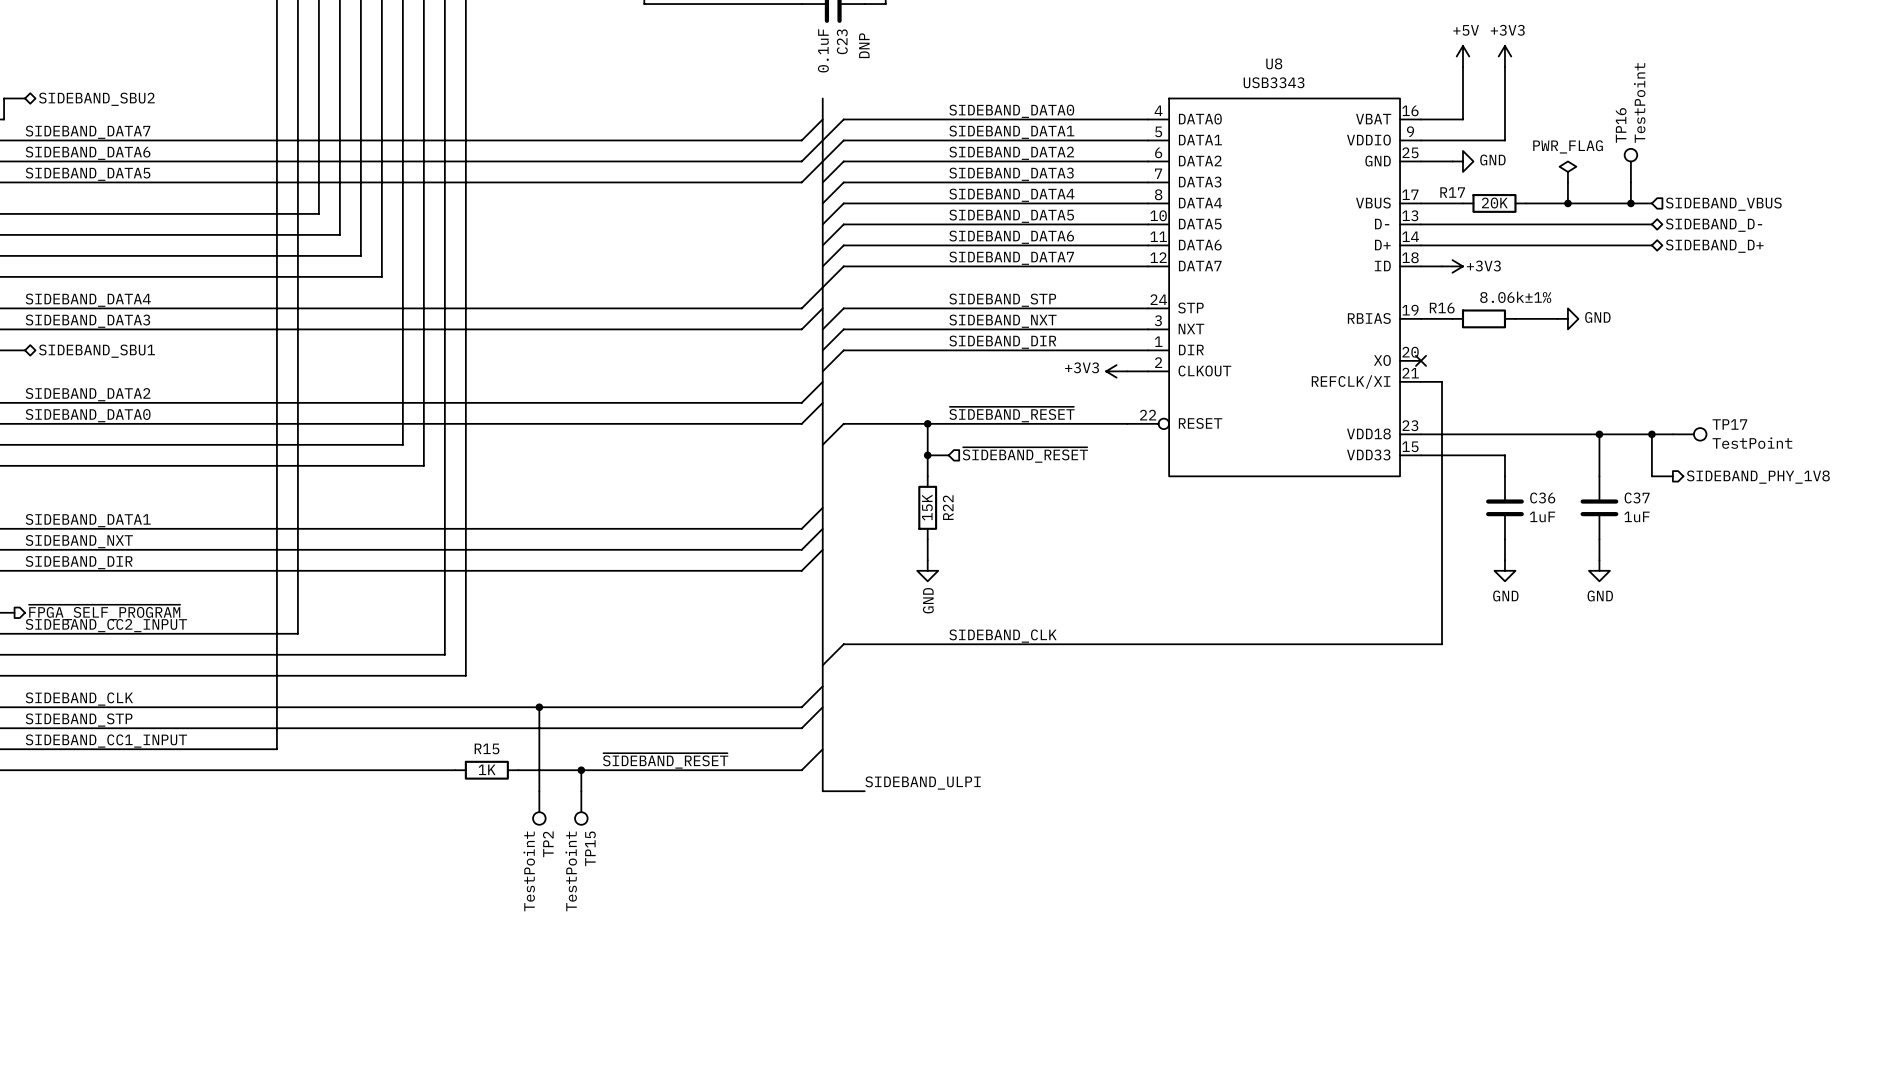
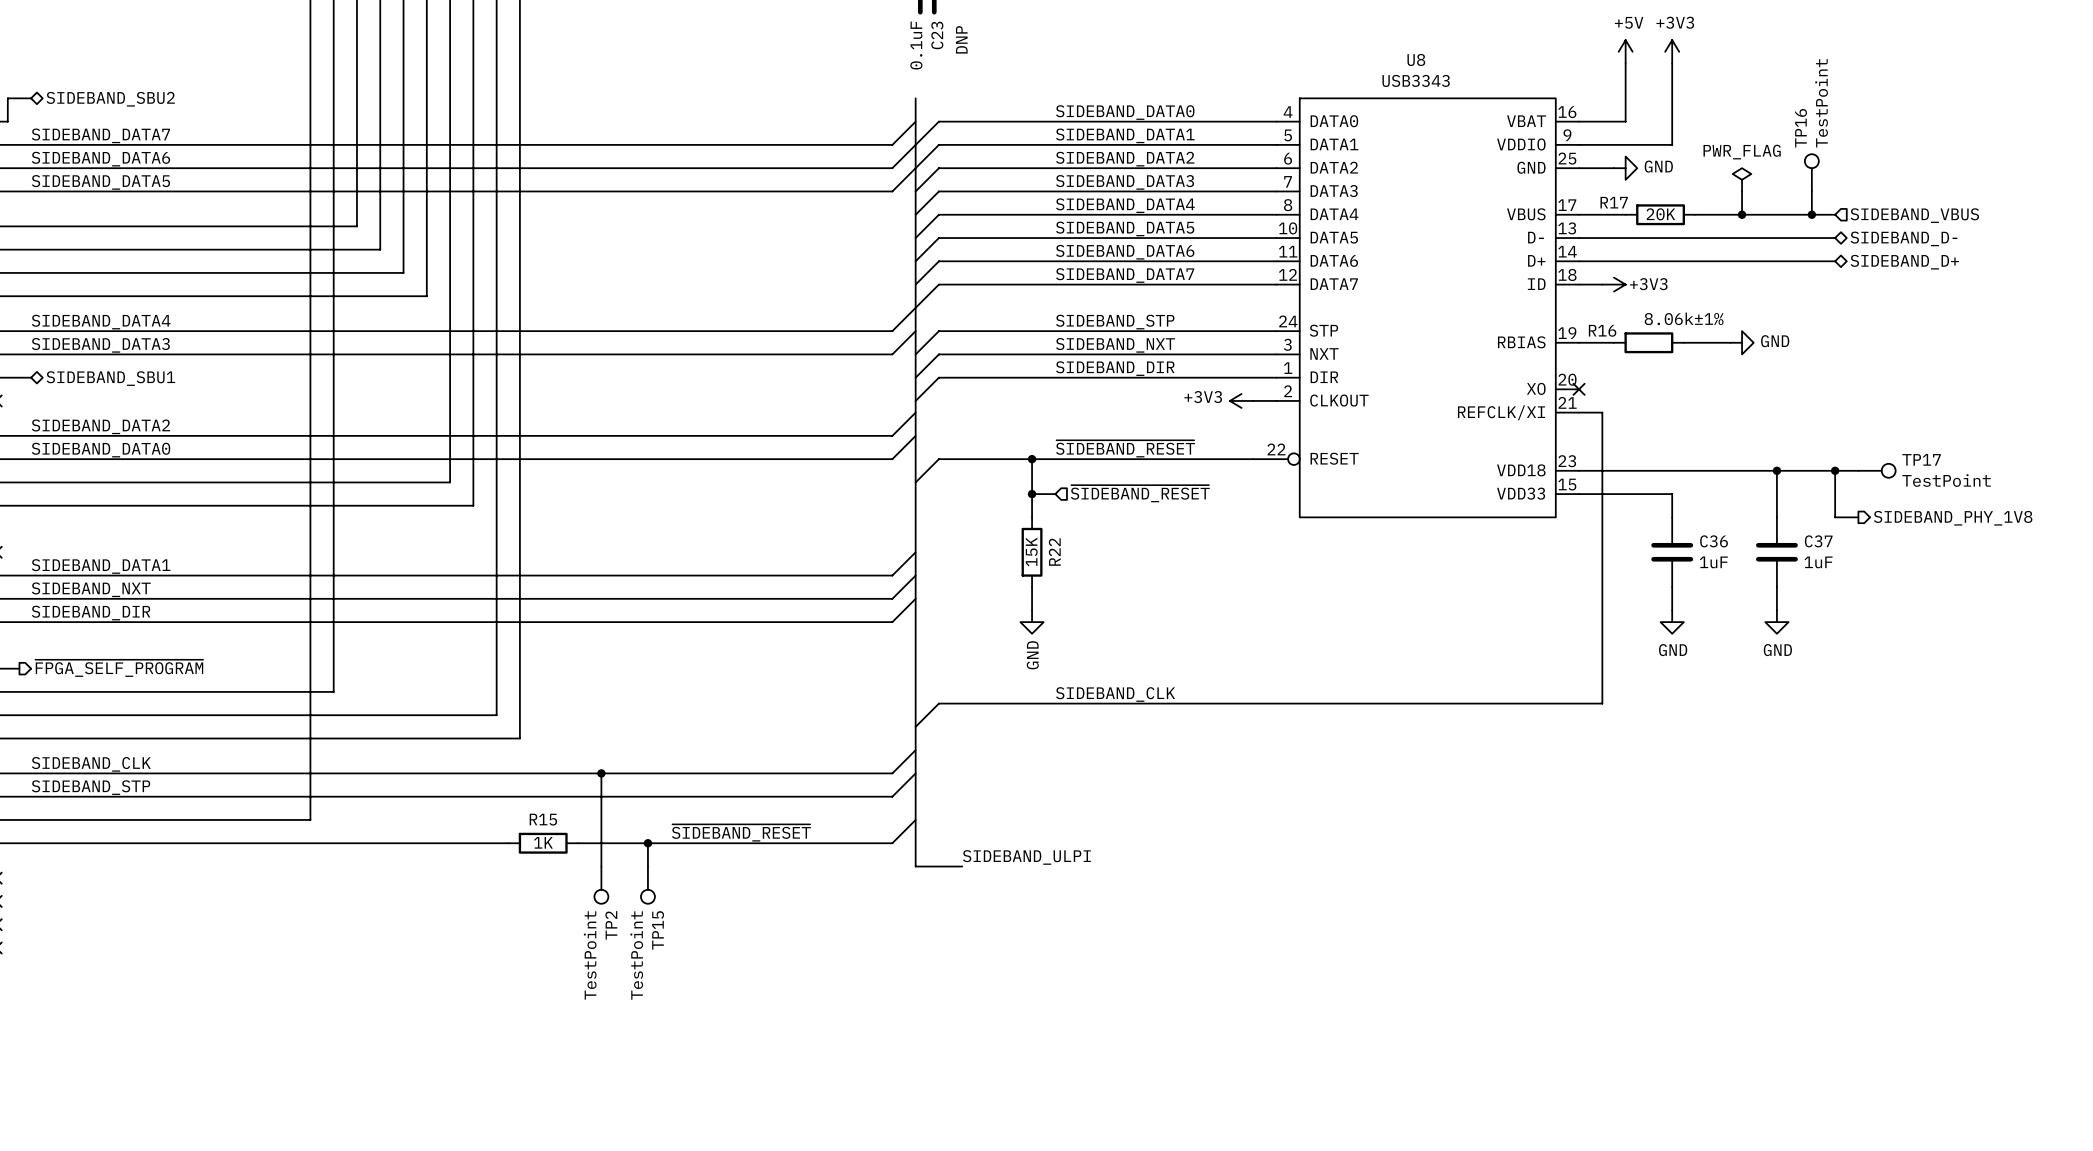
label: SIDEBAND_CC2_INPUT (106, 625) -> none
label: SIDEBAND_CC1_INPUT (106, 741) -> none

